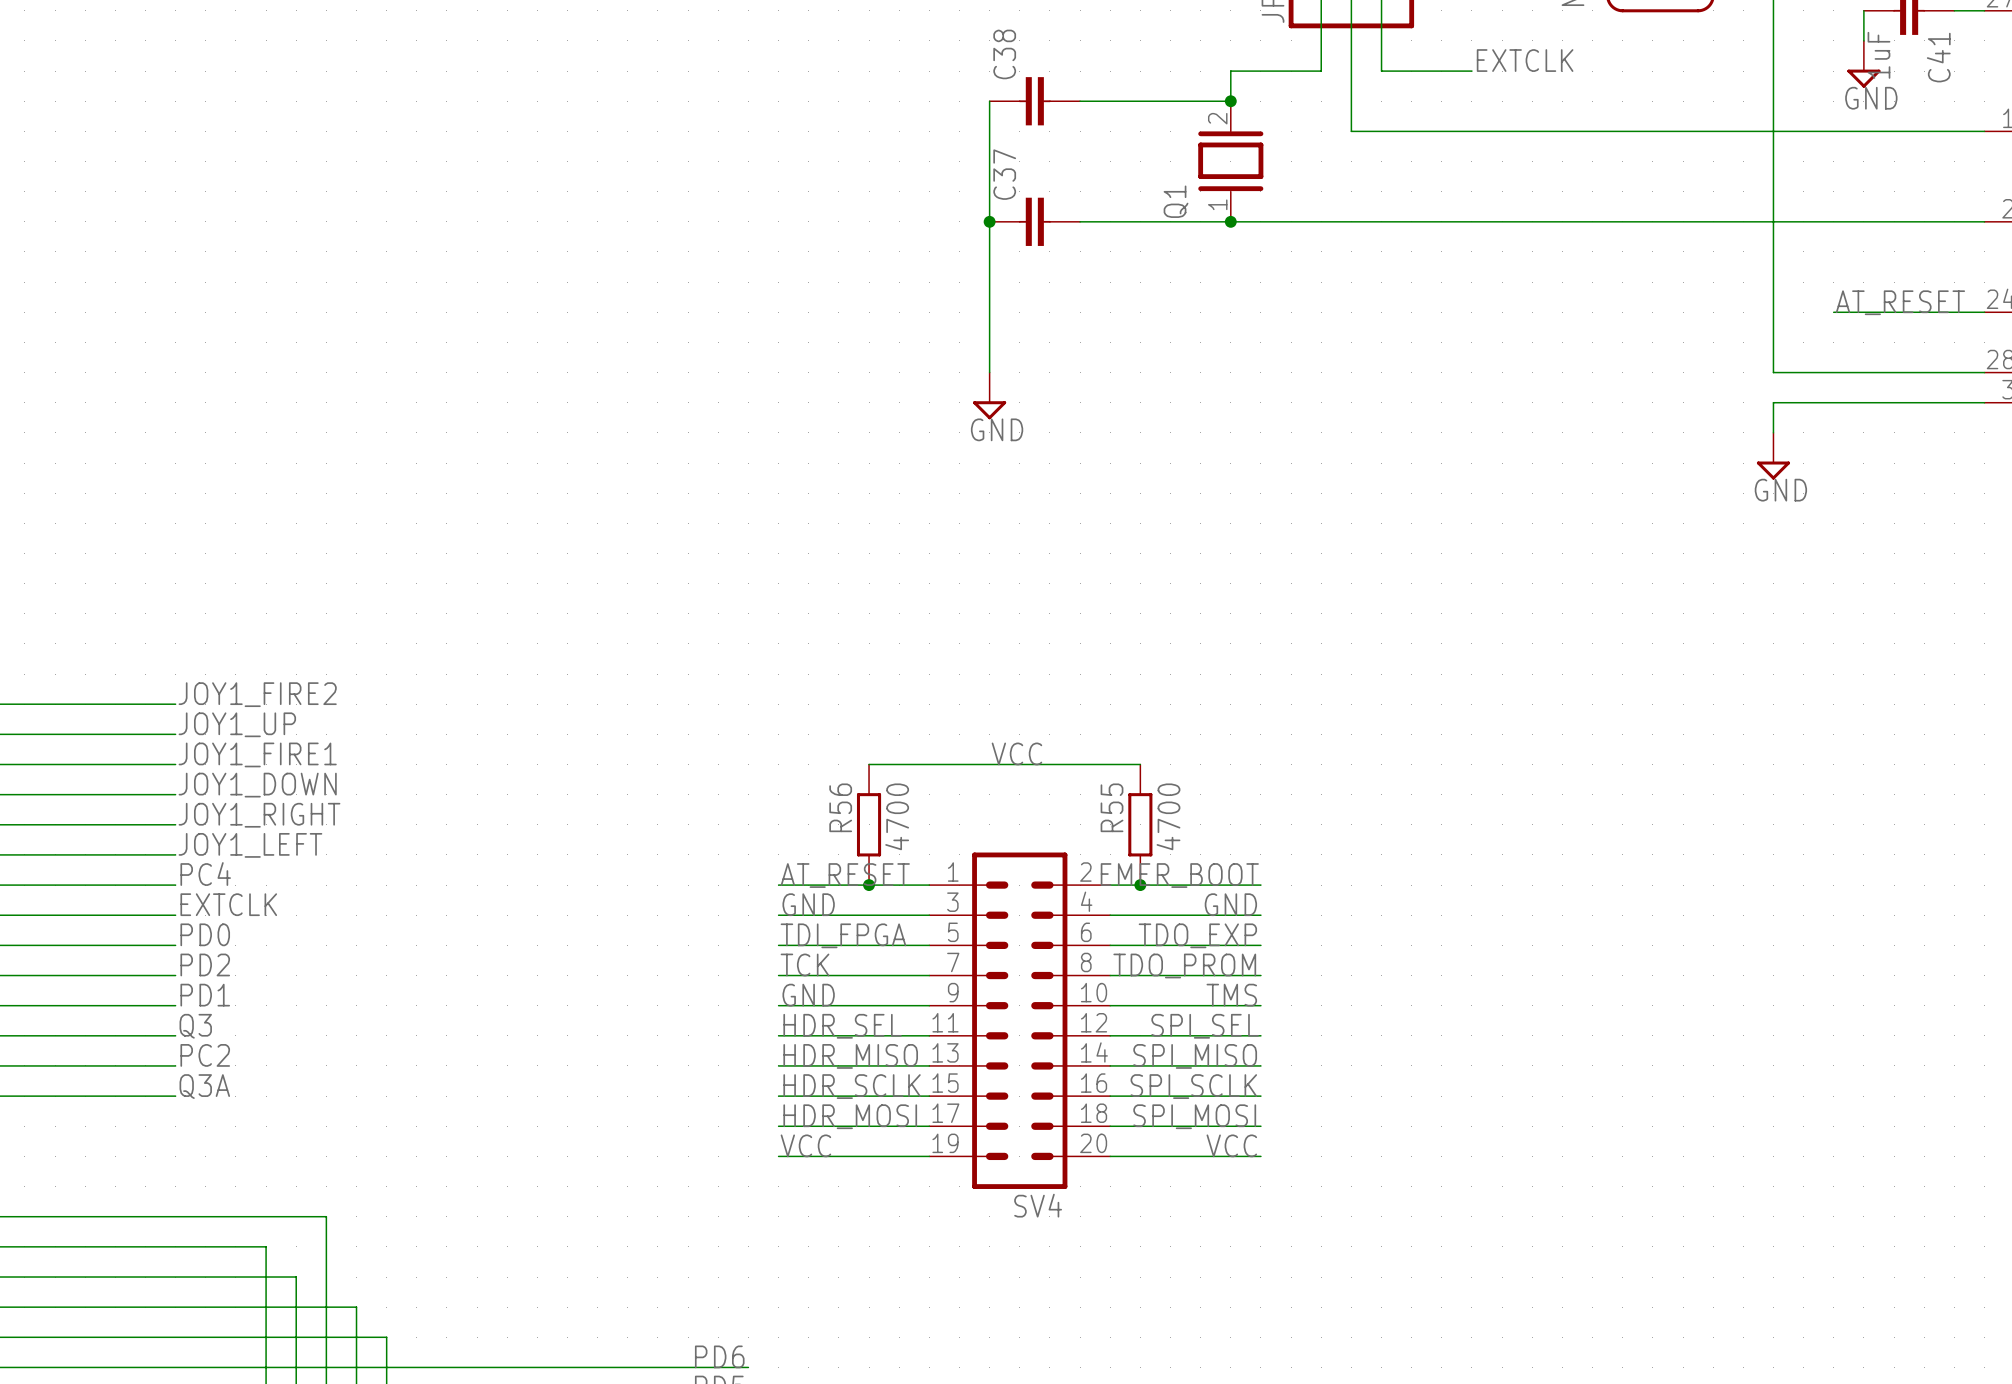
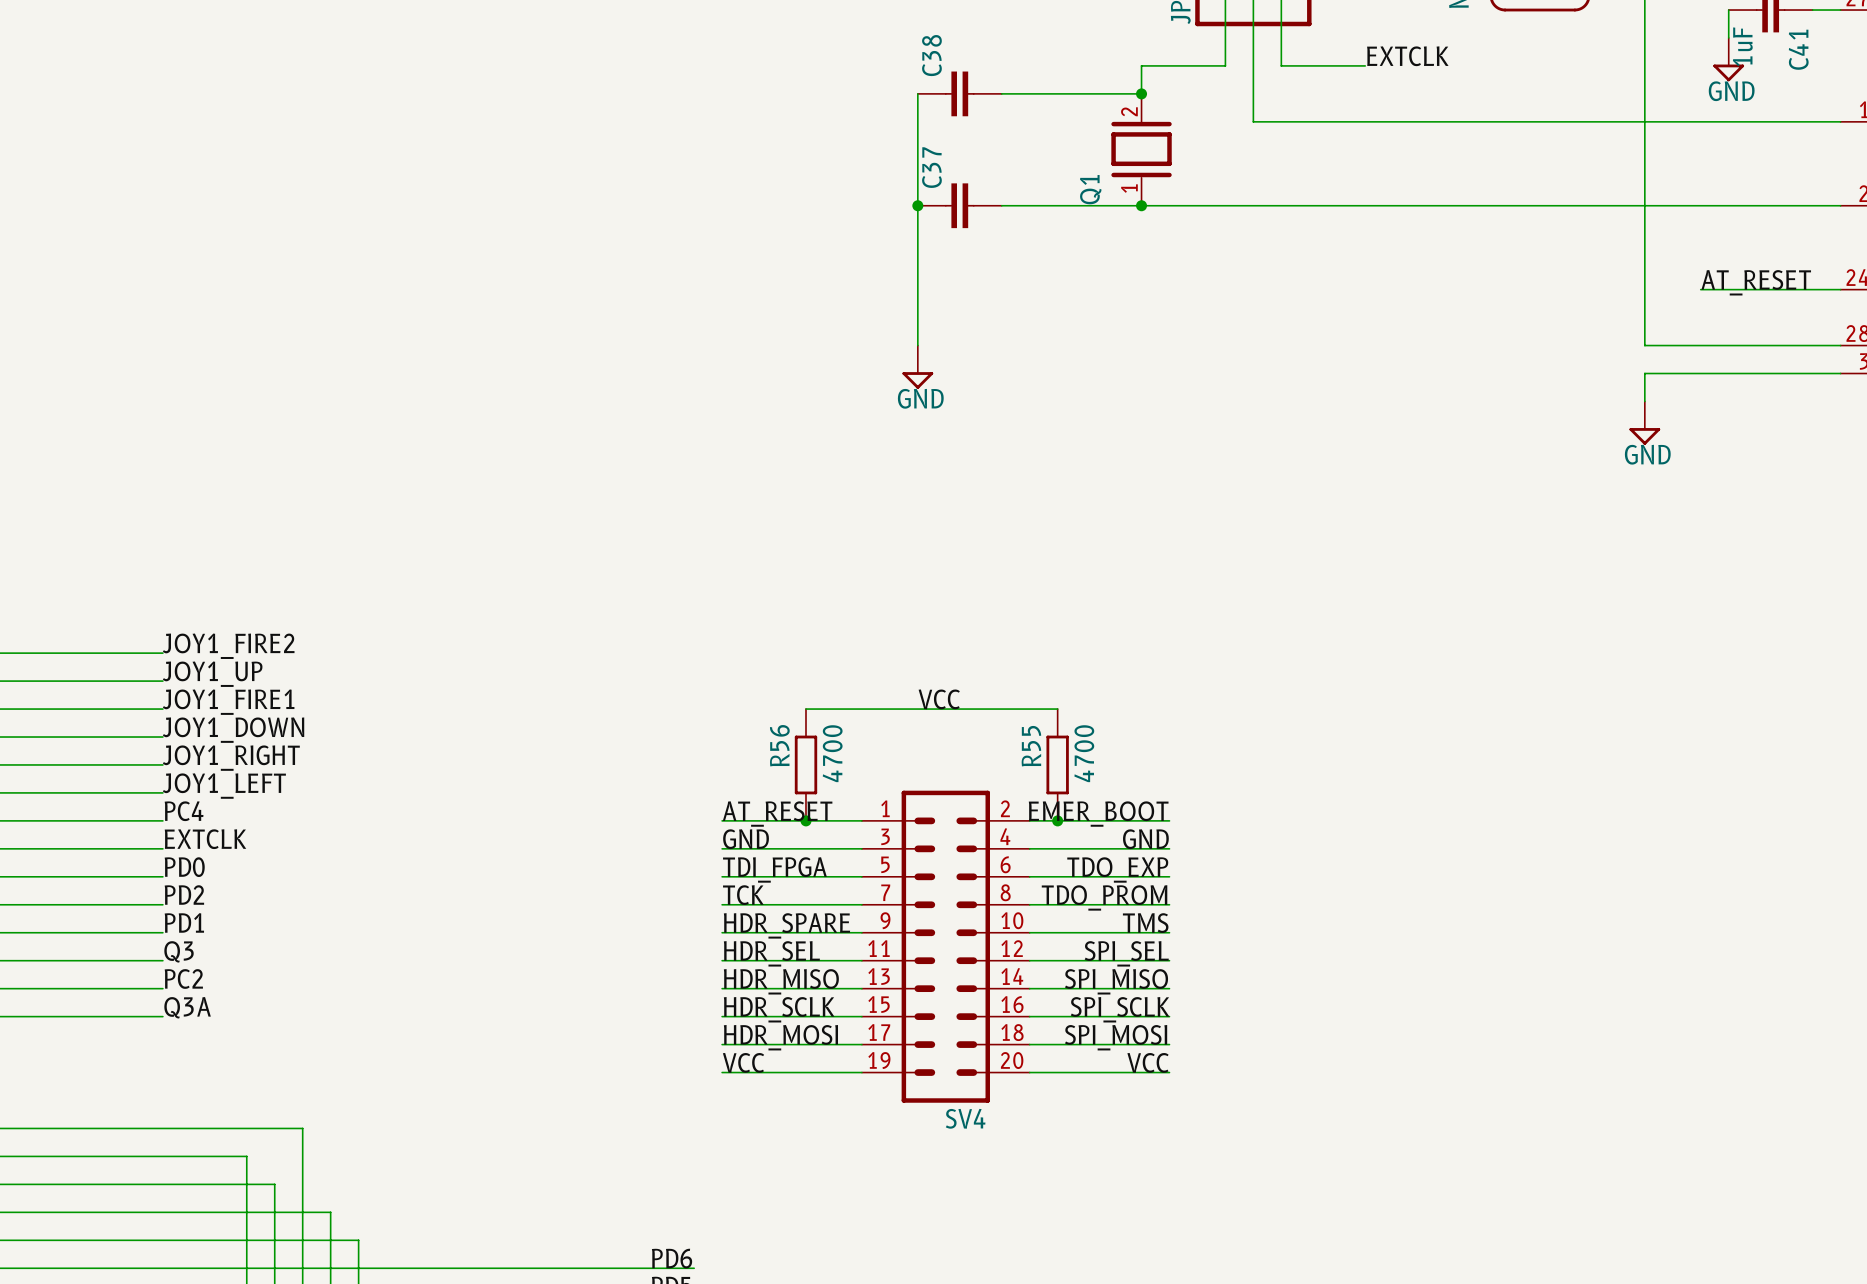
label: GND (808, 995) -> HDR_SPARE (786, 925)

